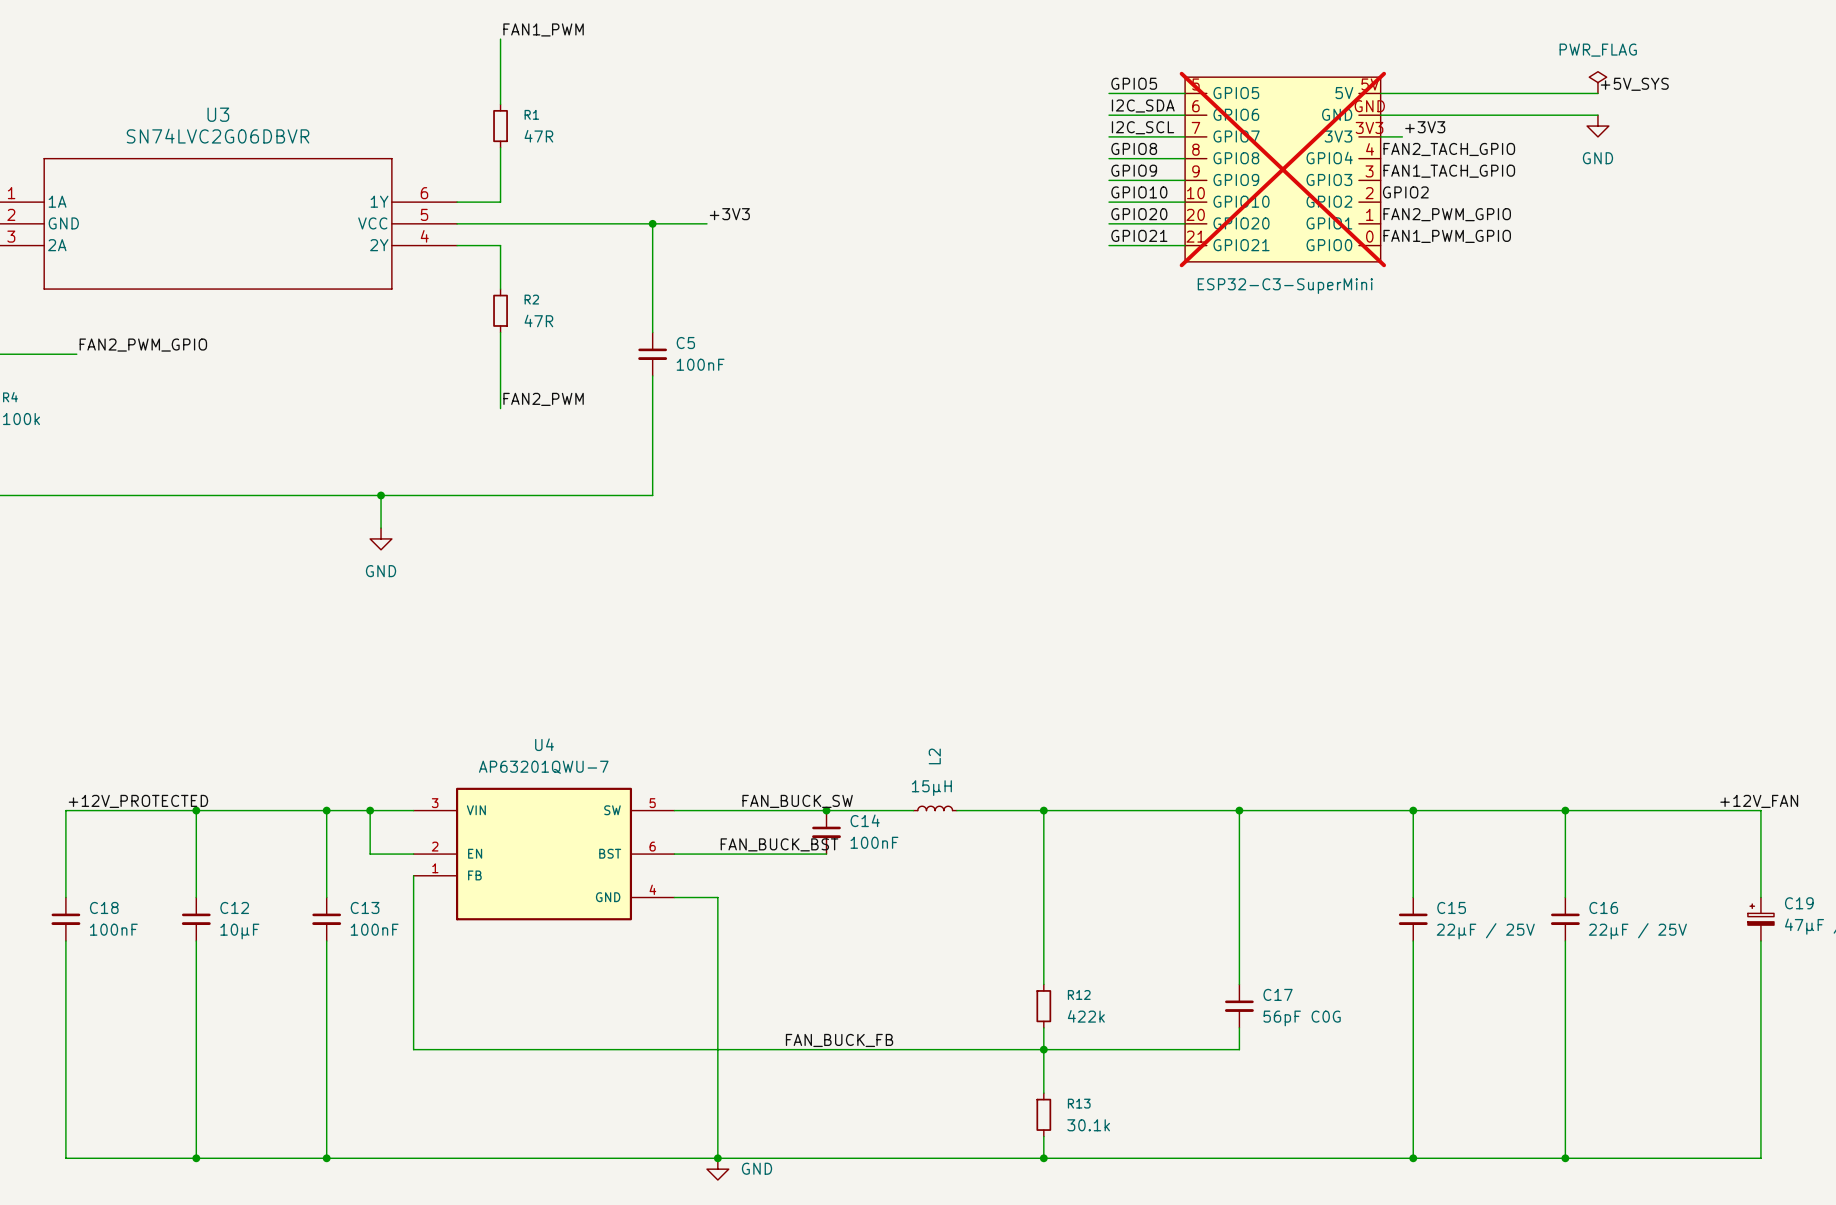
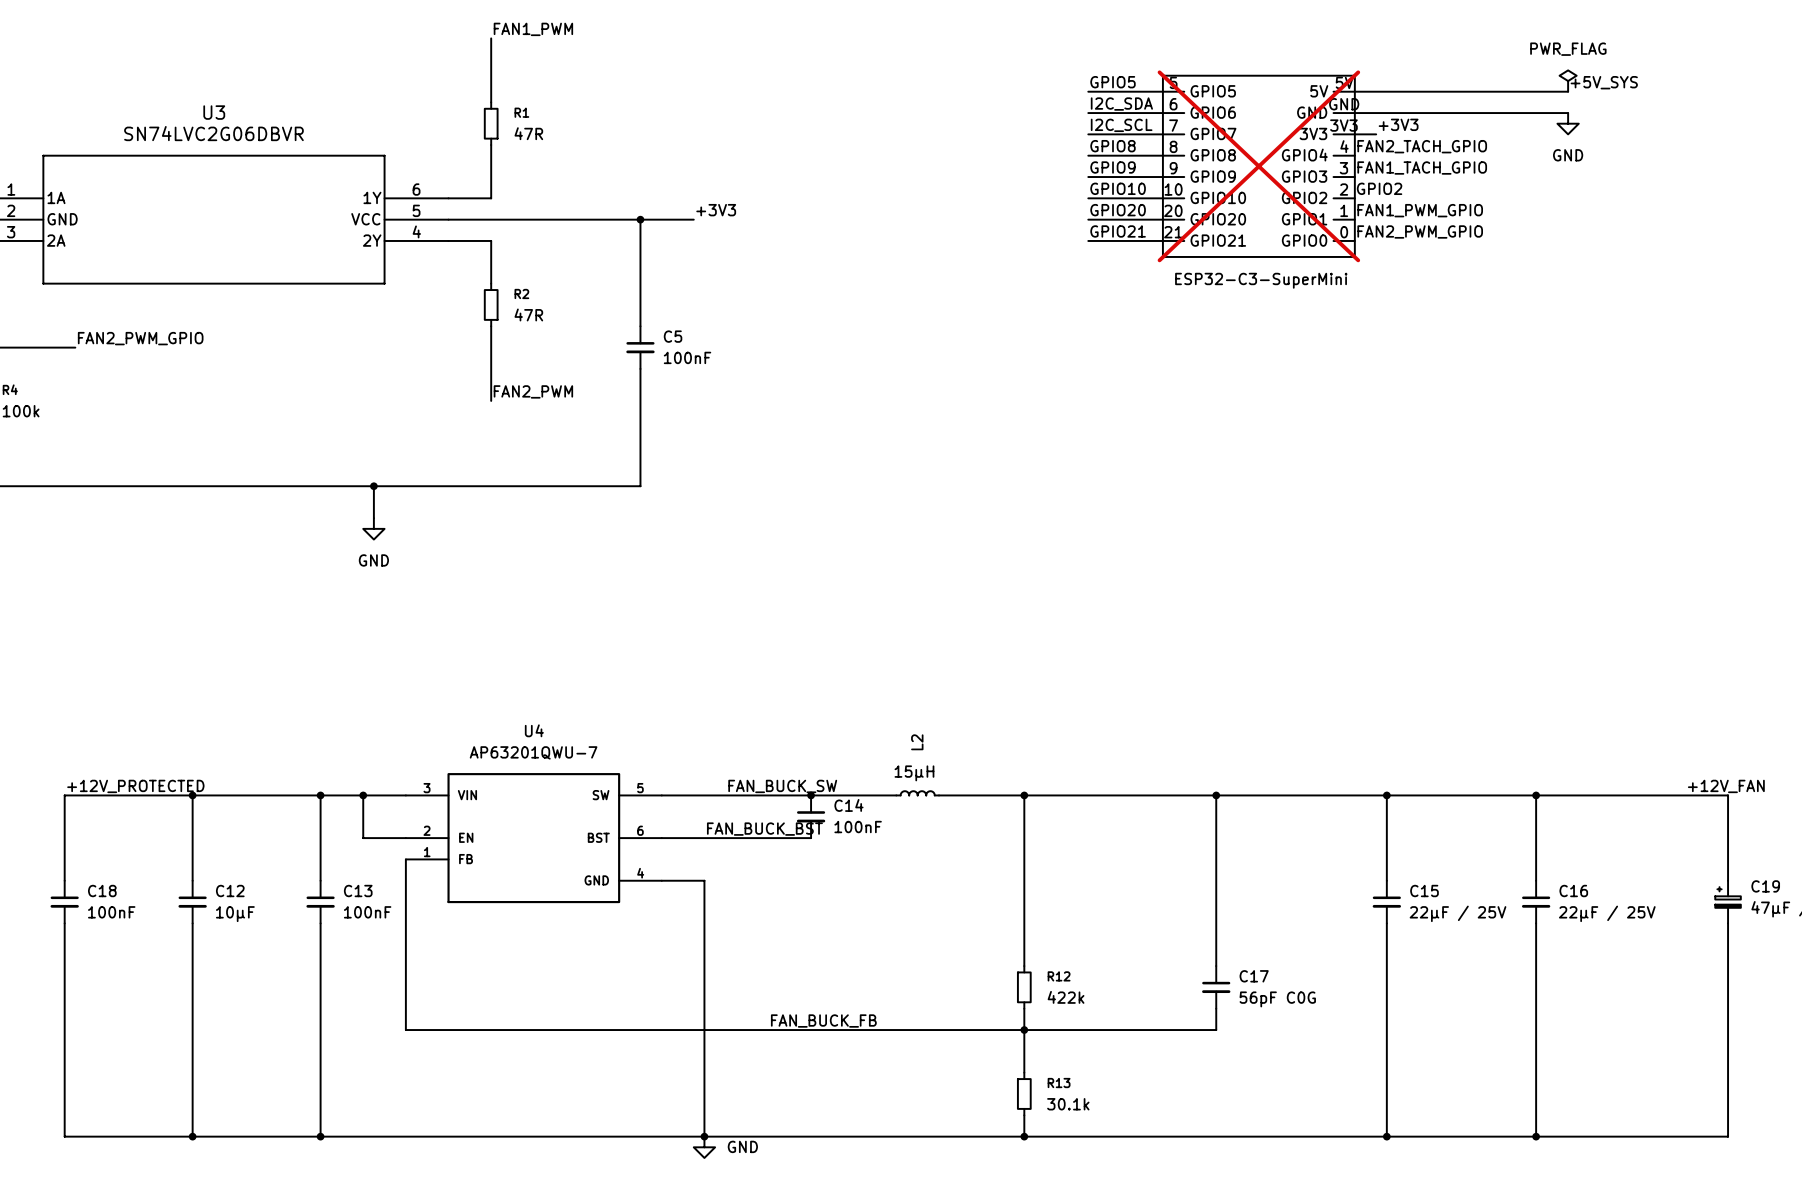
label: FAN2_PWM_GPIO (1447, 214) -> FAN1_PWM_GPIO (1420, 210)
label: FAN1_PWM_GPIO (1447, 236) -> FAN2_PWM_GPIO (1420, 231)

